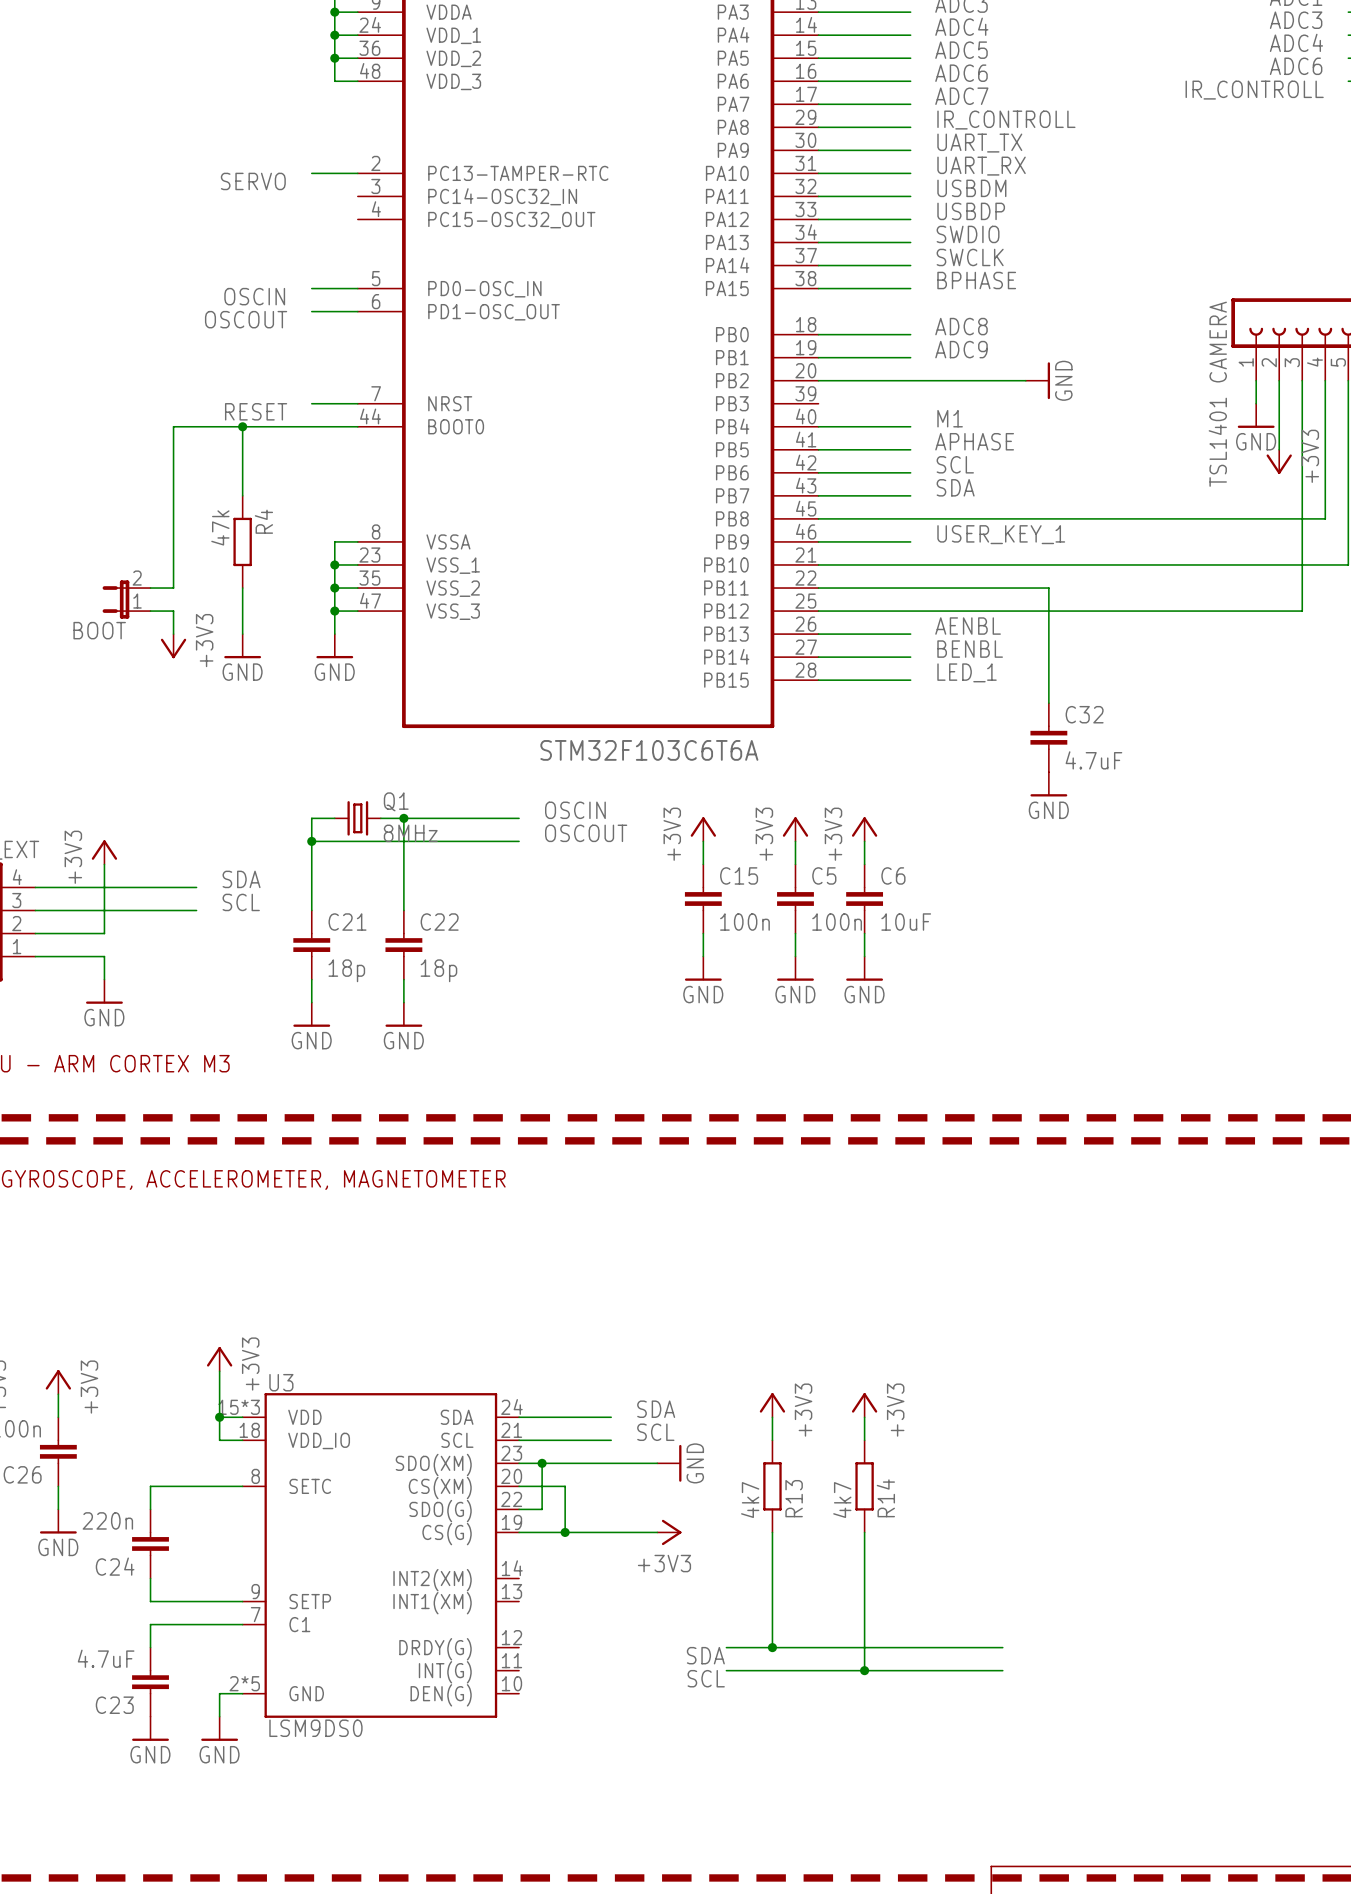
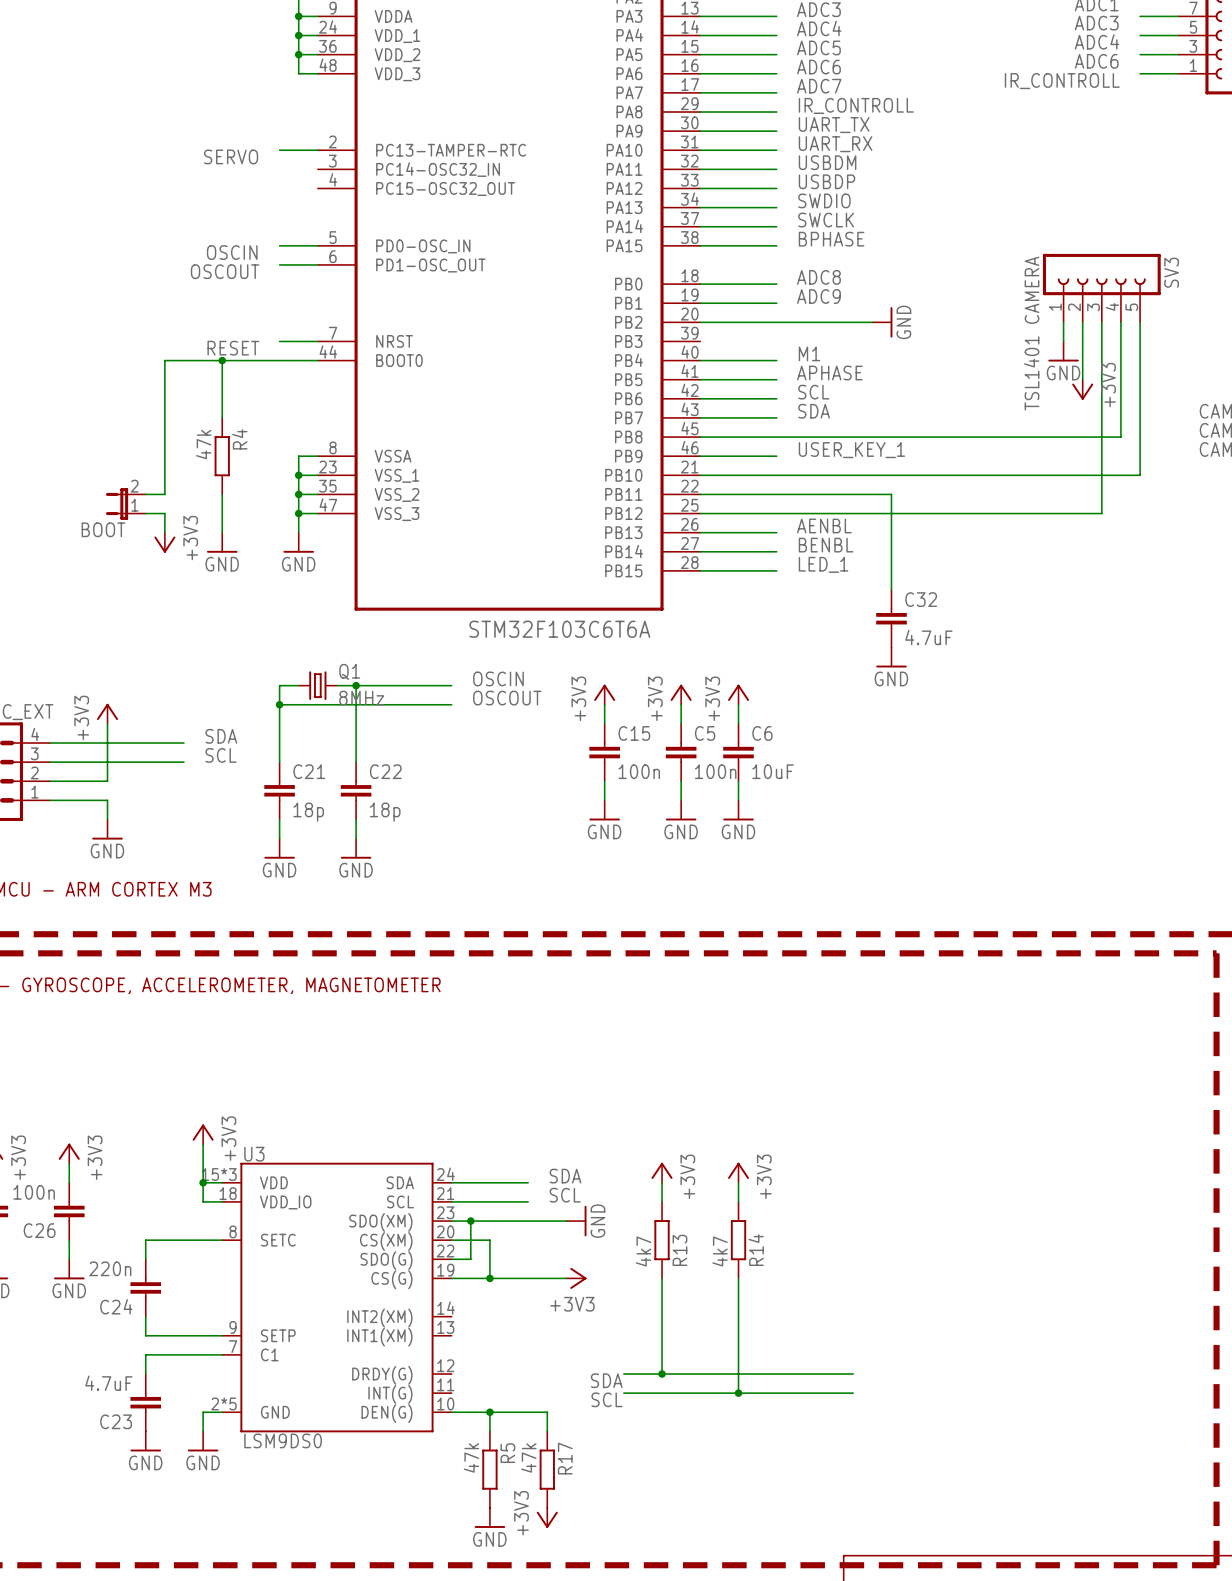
wire: none -> (451, 1412) (547, 1412) (547, 1431)
wire: none -> (489, 1412) (489, 1431)
junction: none -> (489, 1412)
R5: none -> 47k (489, 1469)
R17: none -> 47k (547, 1469)
power symbol: none -> GND (489, 1517)
power symbol: none -> +3V3 (547, 1517)

